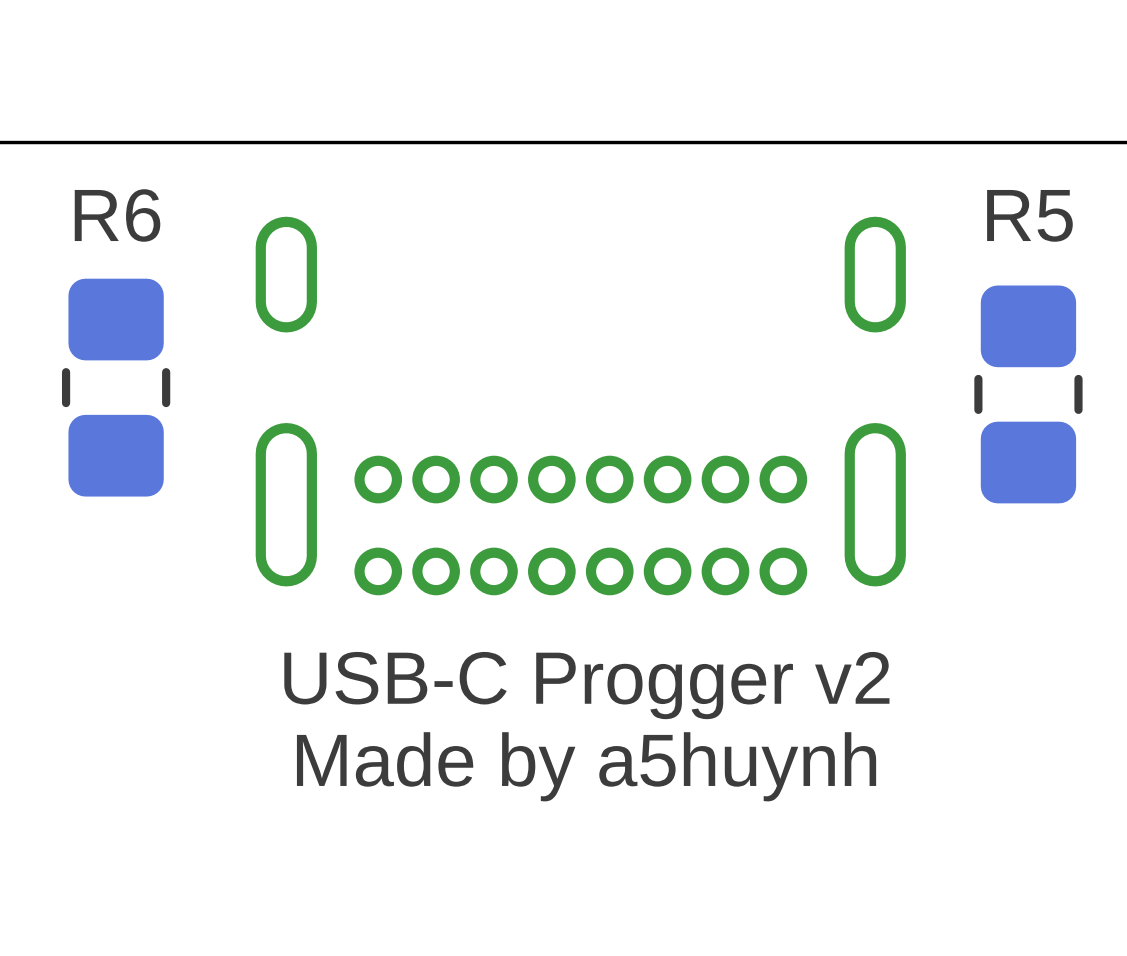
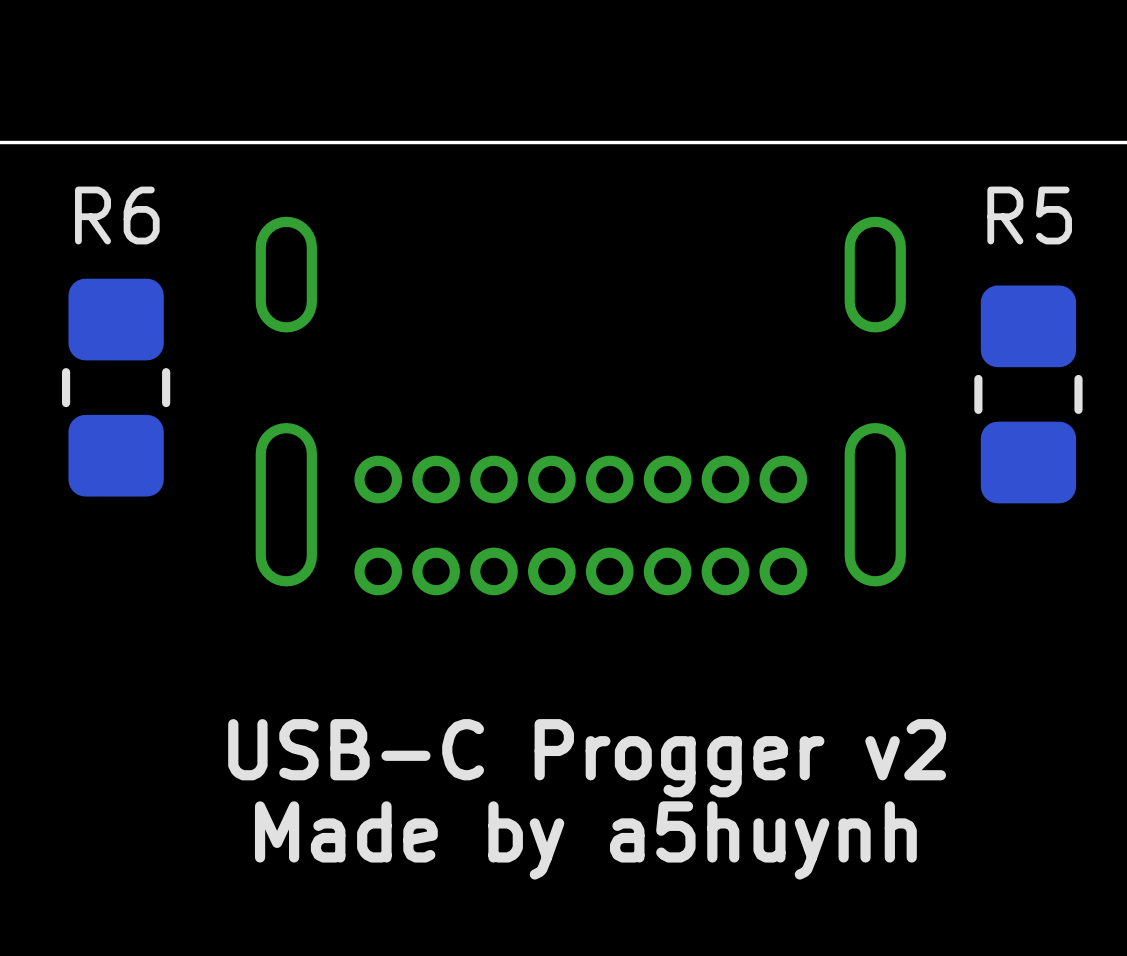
text position: USB-C Progger v2 (586, 685) -> USB-C Progger v2 (587, 758)
text position: Made by a5huynh (586, 766) -> Made by a5huynh (585, 840)

